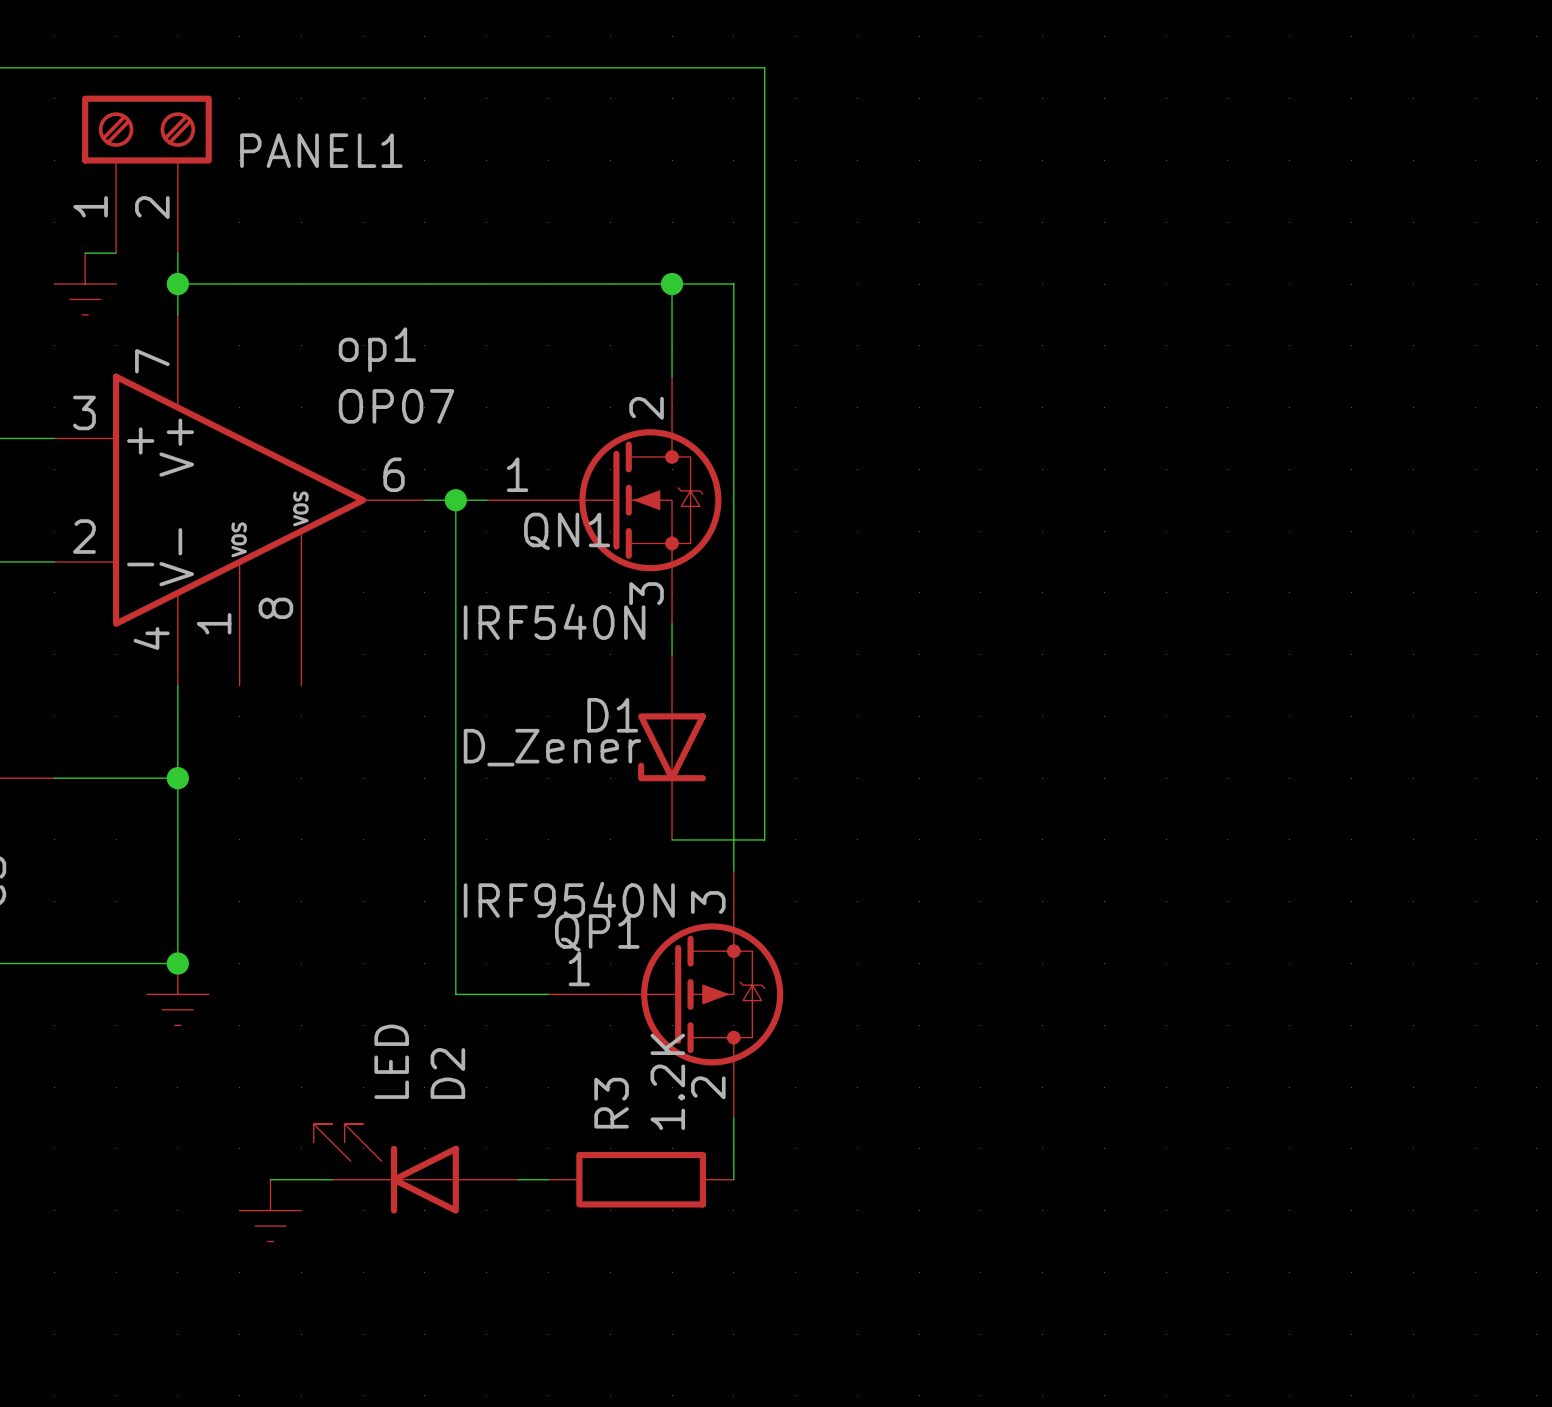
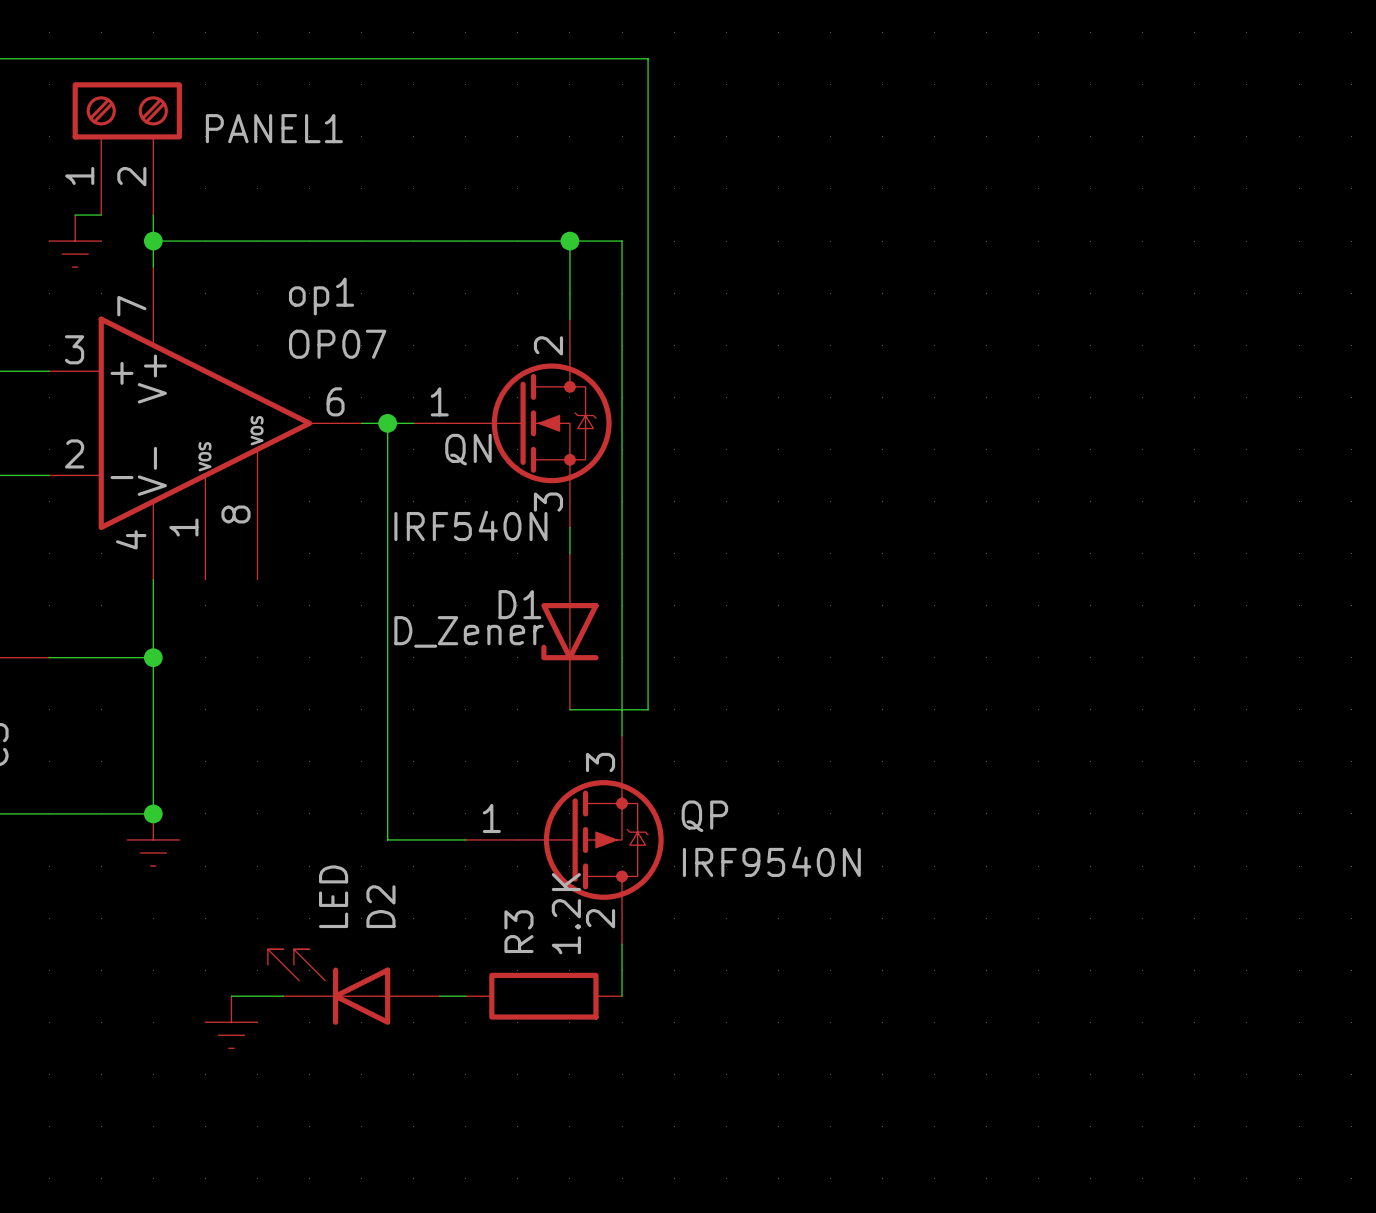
QN1 name: QN1 (567, 531) -> QN (468, 449)
QP1 value position: IRF9540N (569, 899) -> IRF9540N (771, 861)
QP1 name: QP1 (597, 932) -> QP (704, 816)

